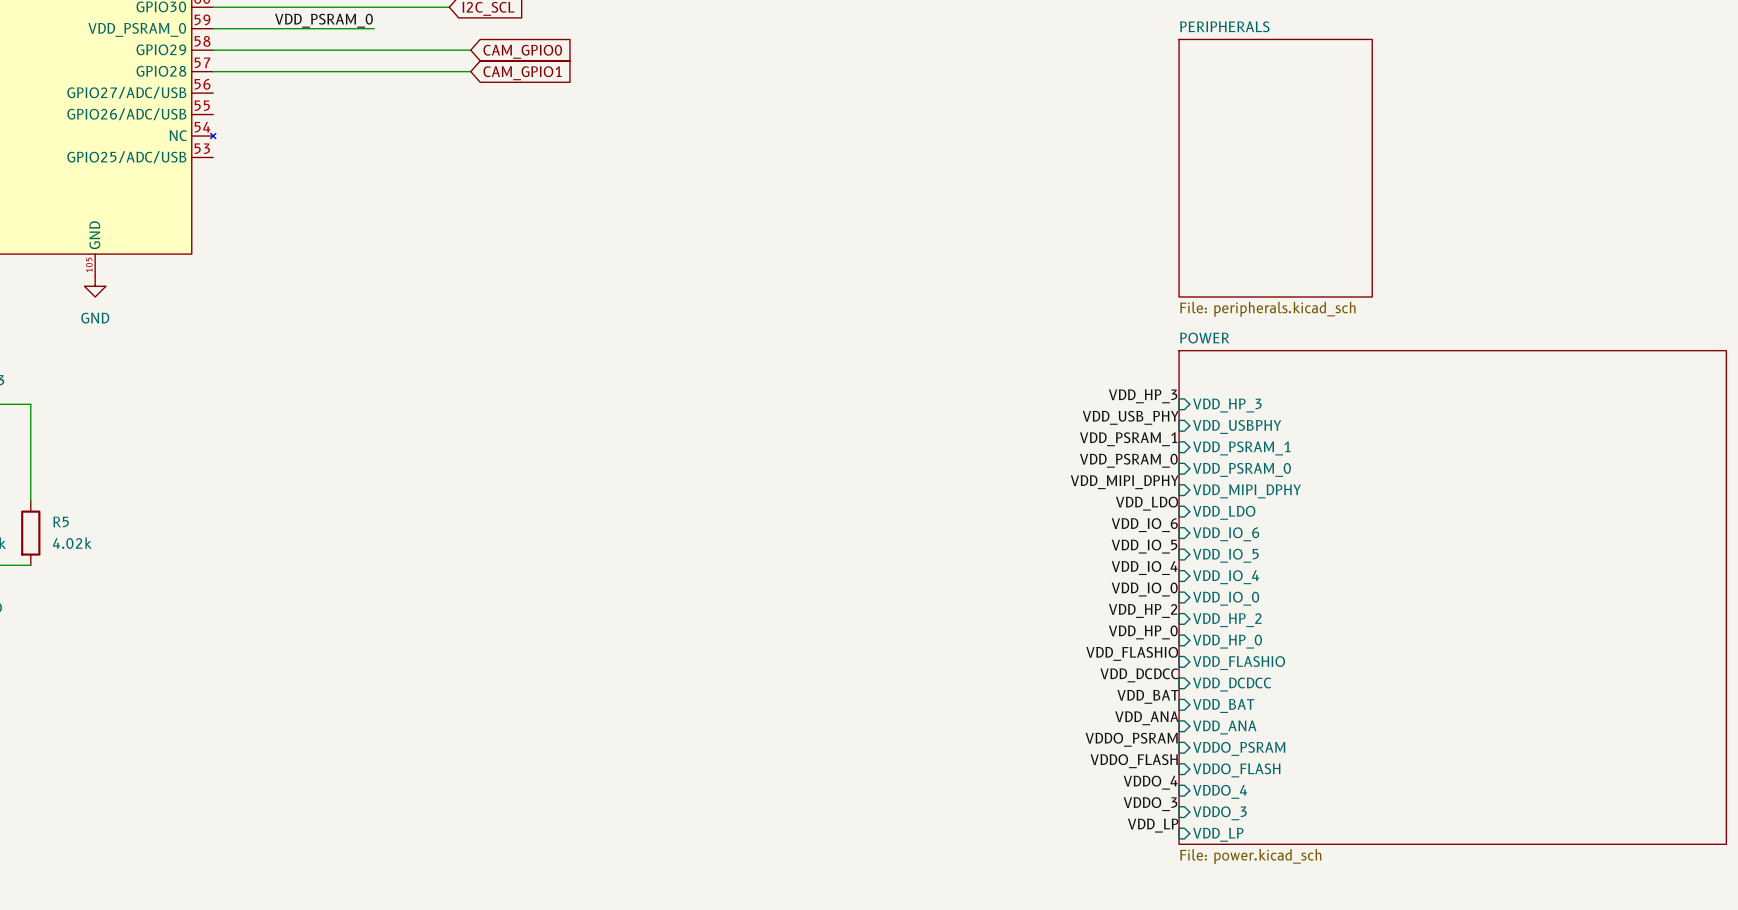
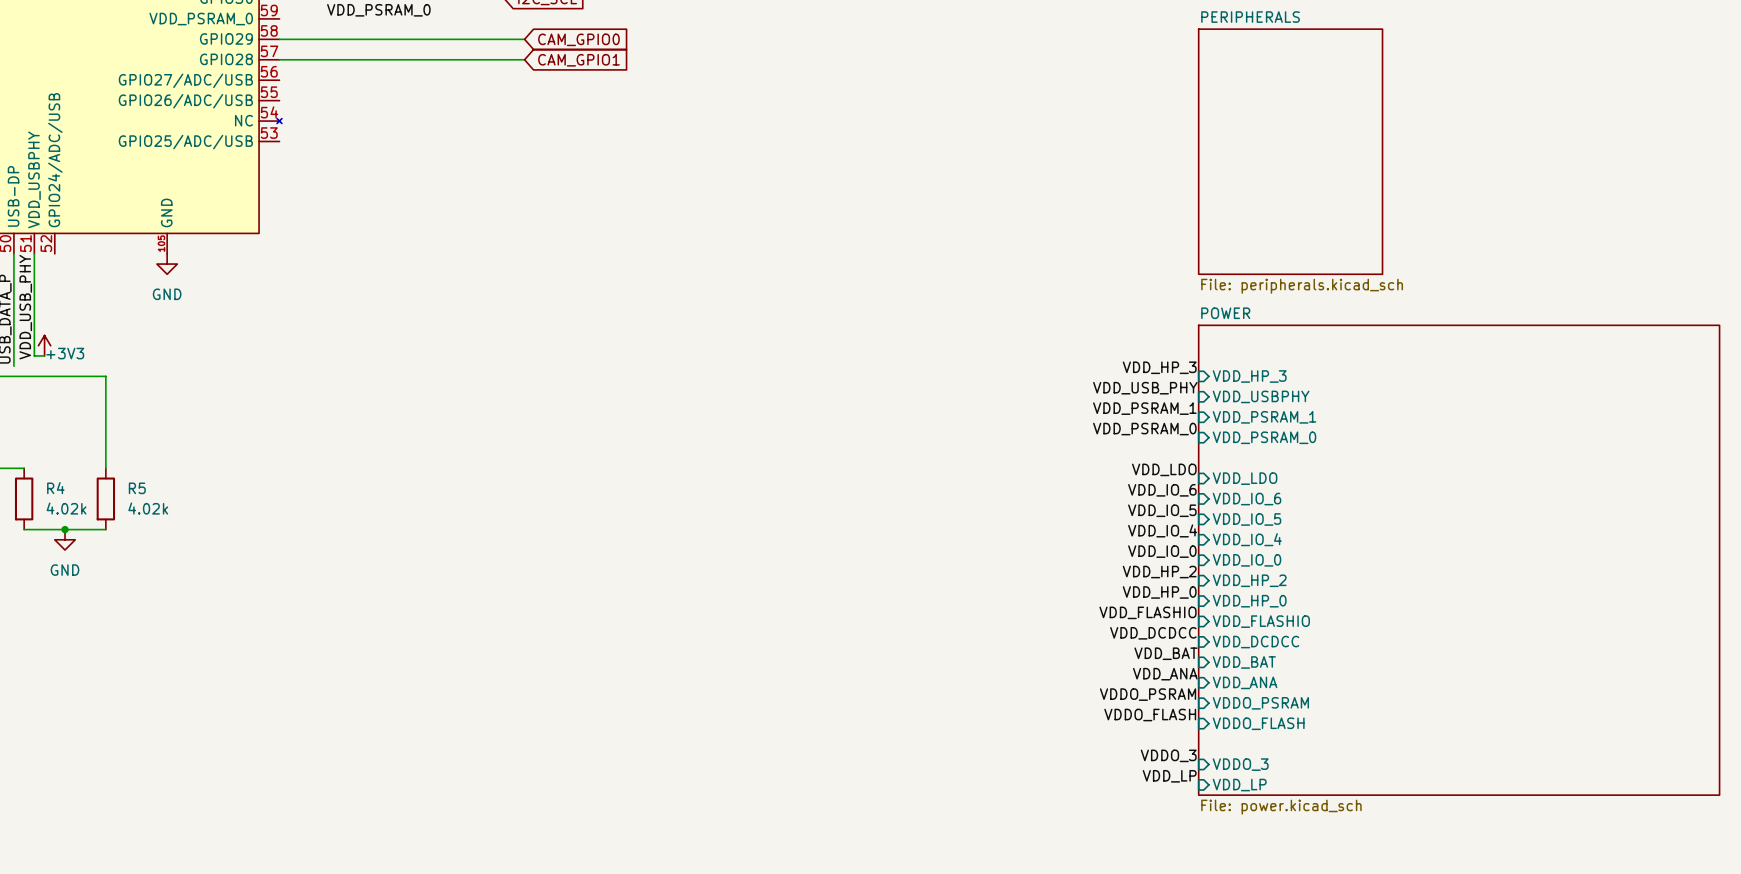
wire: (213, 28) (374, 28) -> none
label: VDD_MIPI_DPHY (1124, 482) -> none
sheet pin: VDD_MIPI_DPHY (1247, 491) -> none
label: VDDO_4 (1150, 782) -> none
sheet pin: VDDO_4 (1220, 791) -> none

